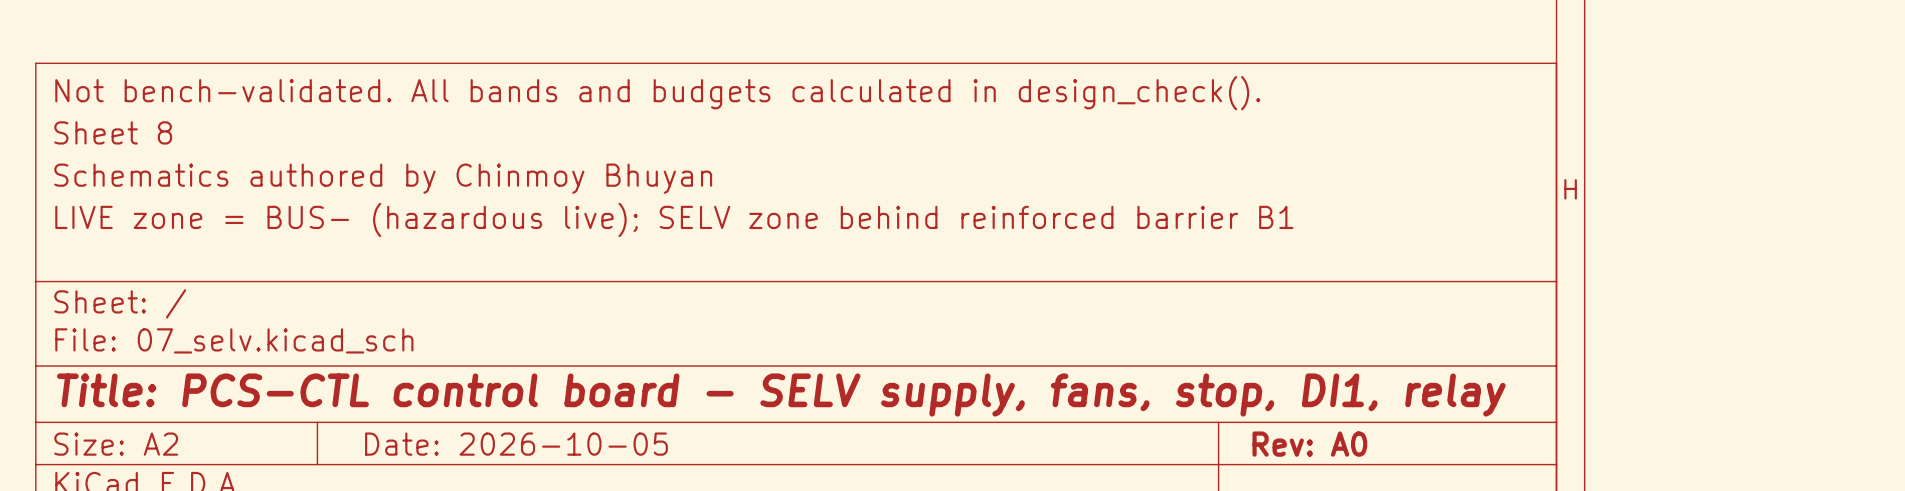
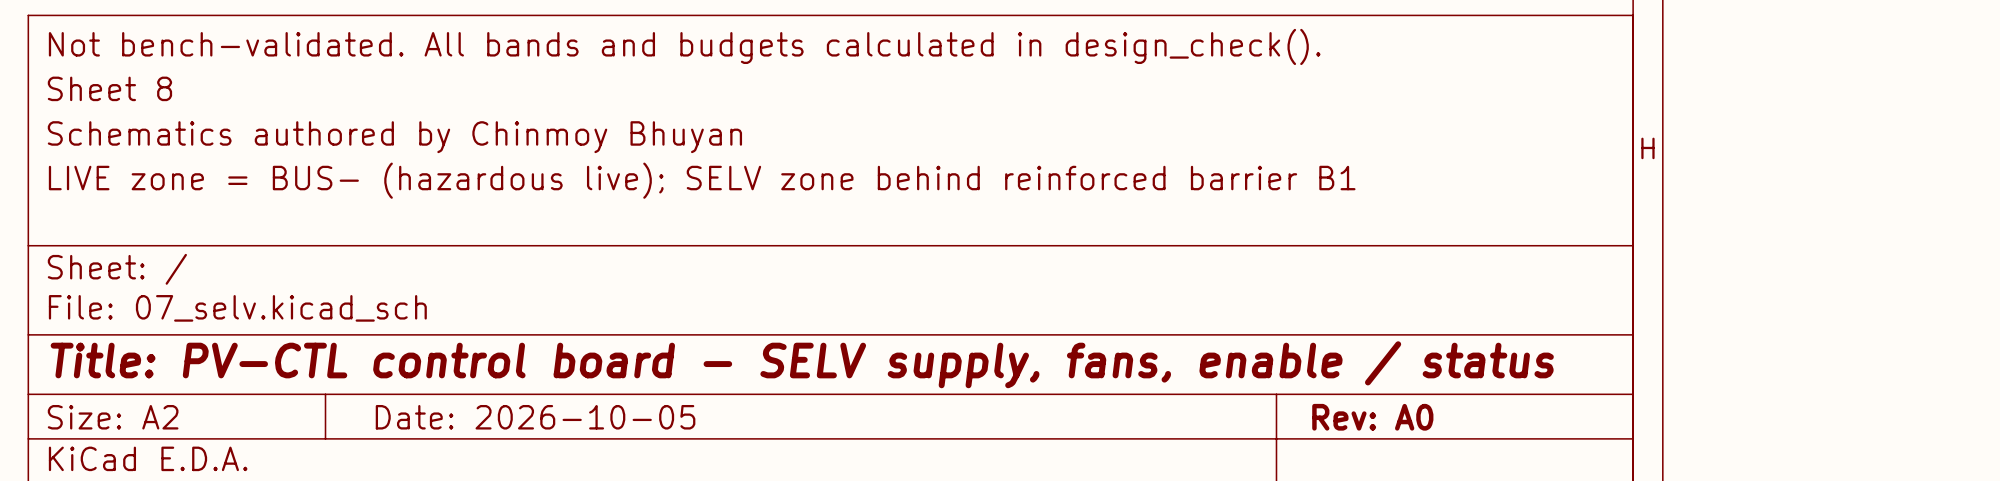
title block: Title: PCS-CTL control board - SELV supply, fans, stop, DI1, relay (781, 395) -> Title: PV-CTL control board - SELV supply, fans, enable / status (802, 364)

